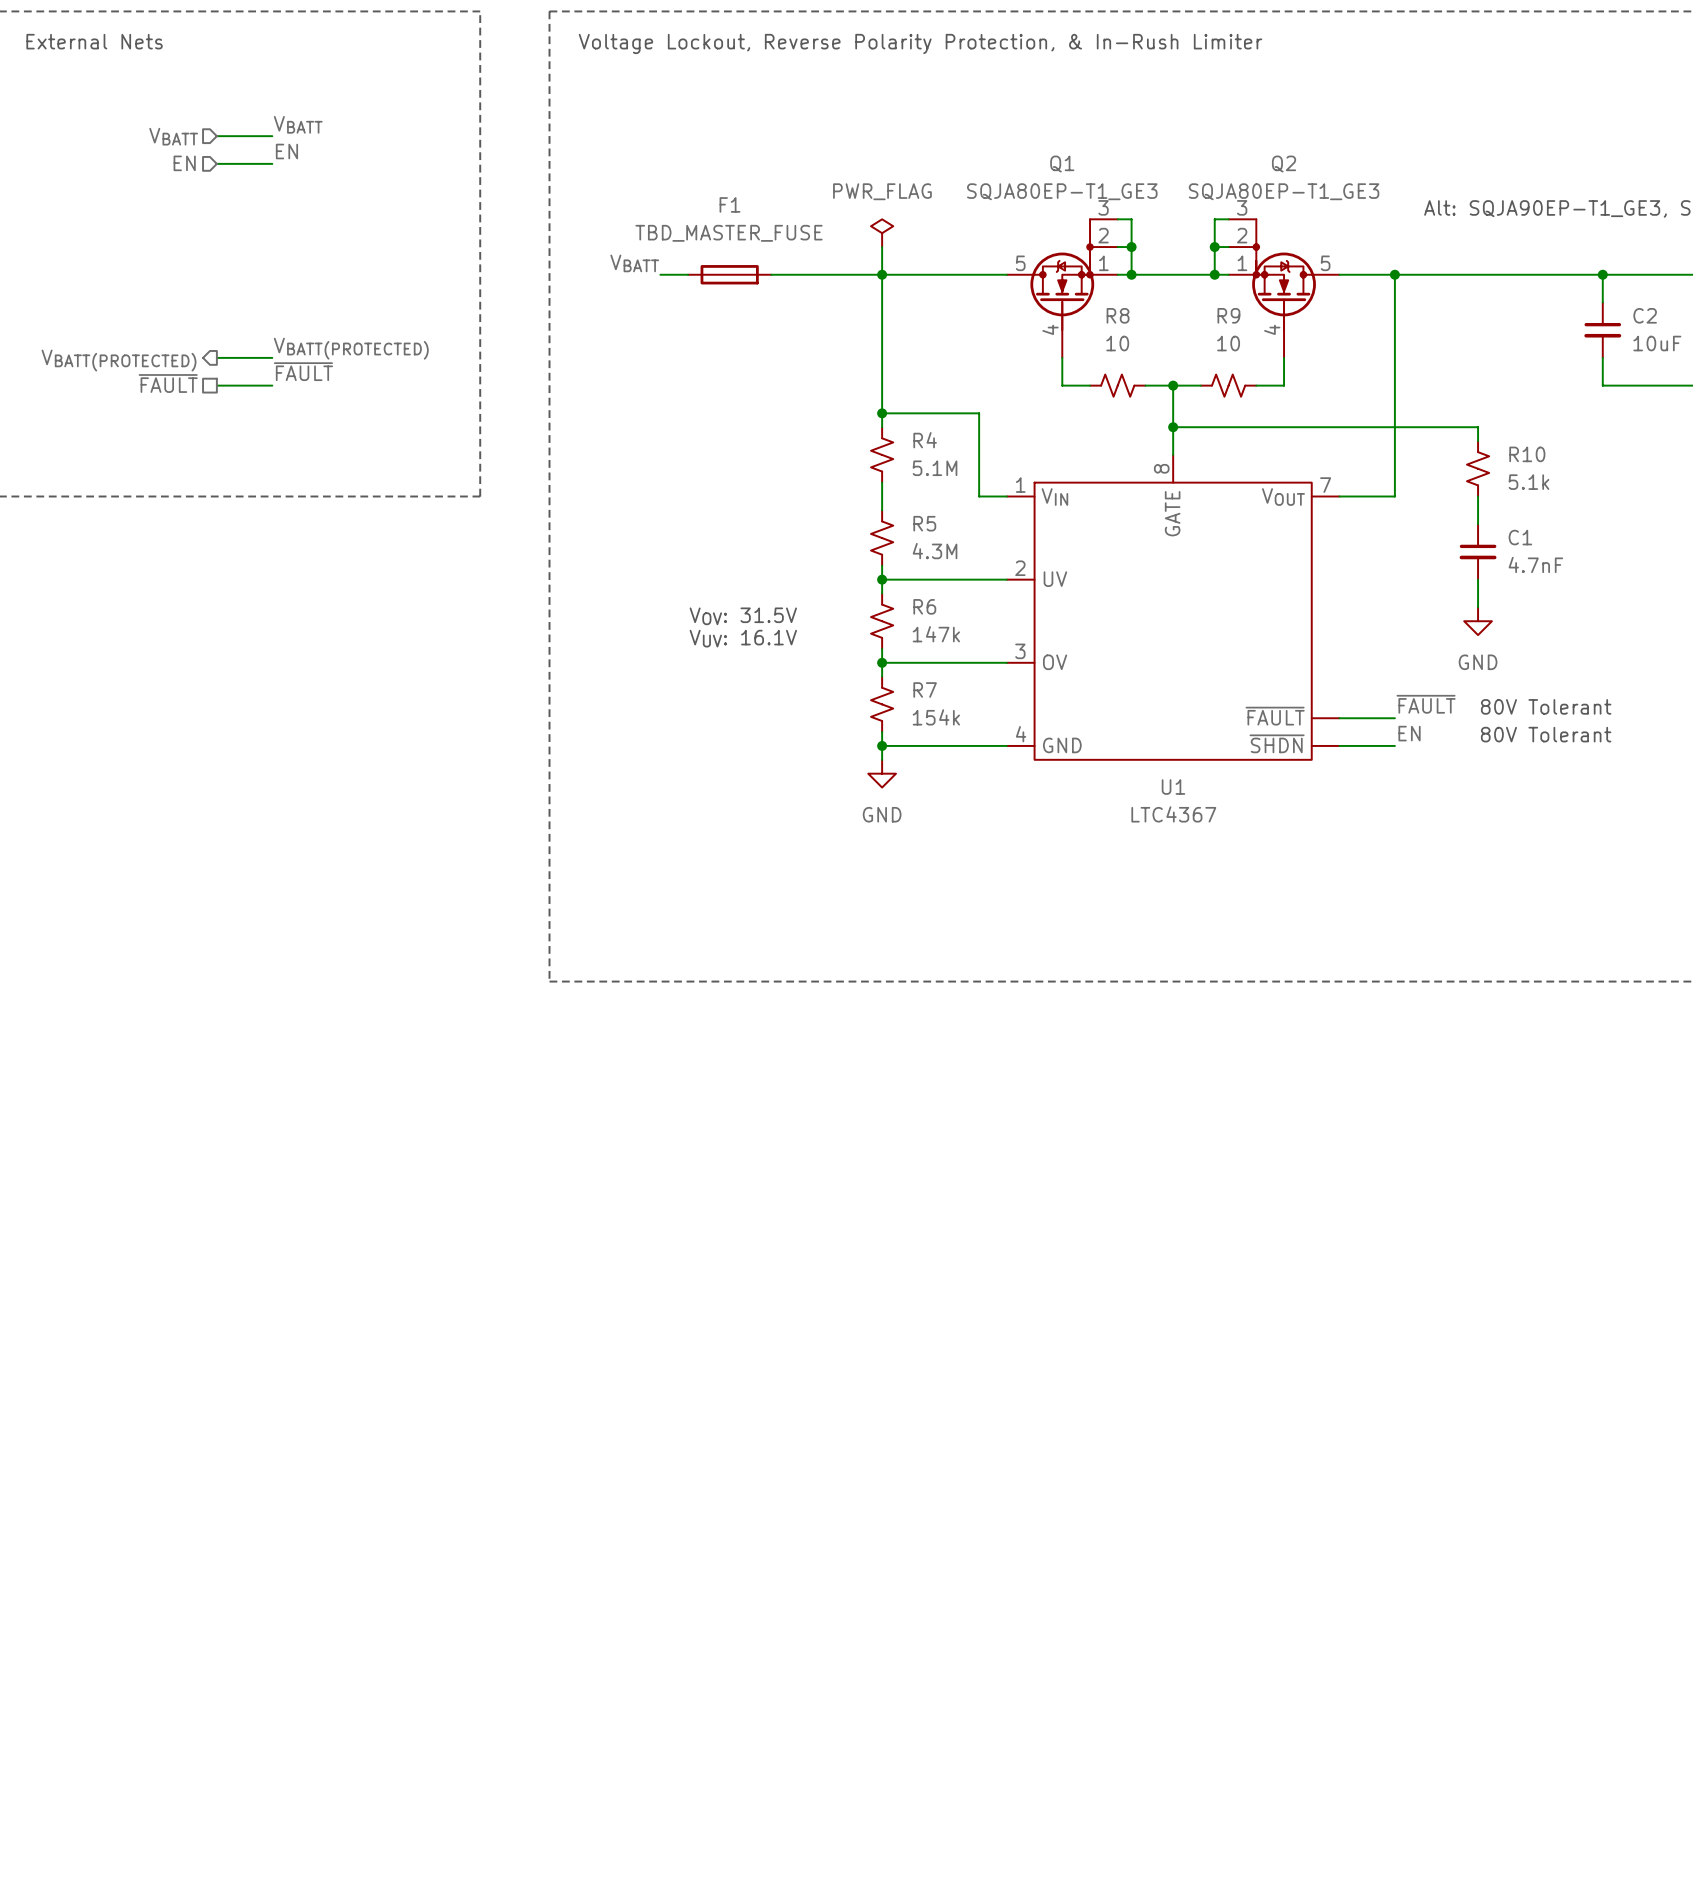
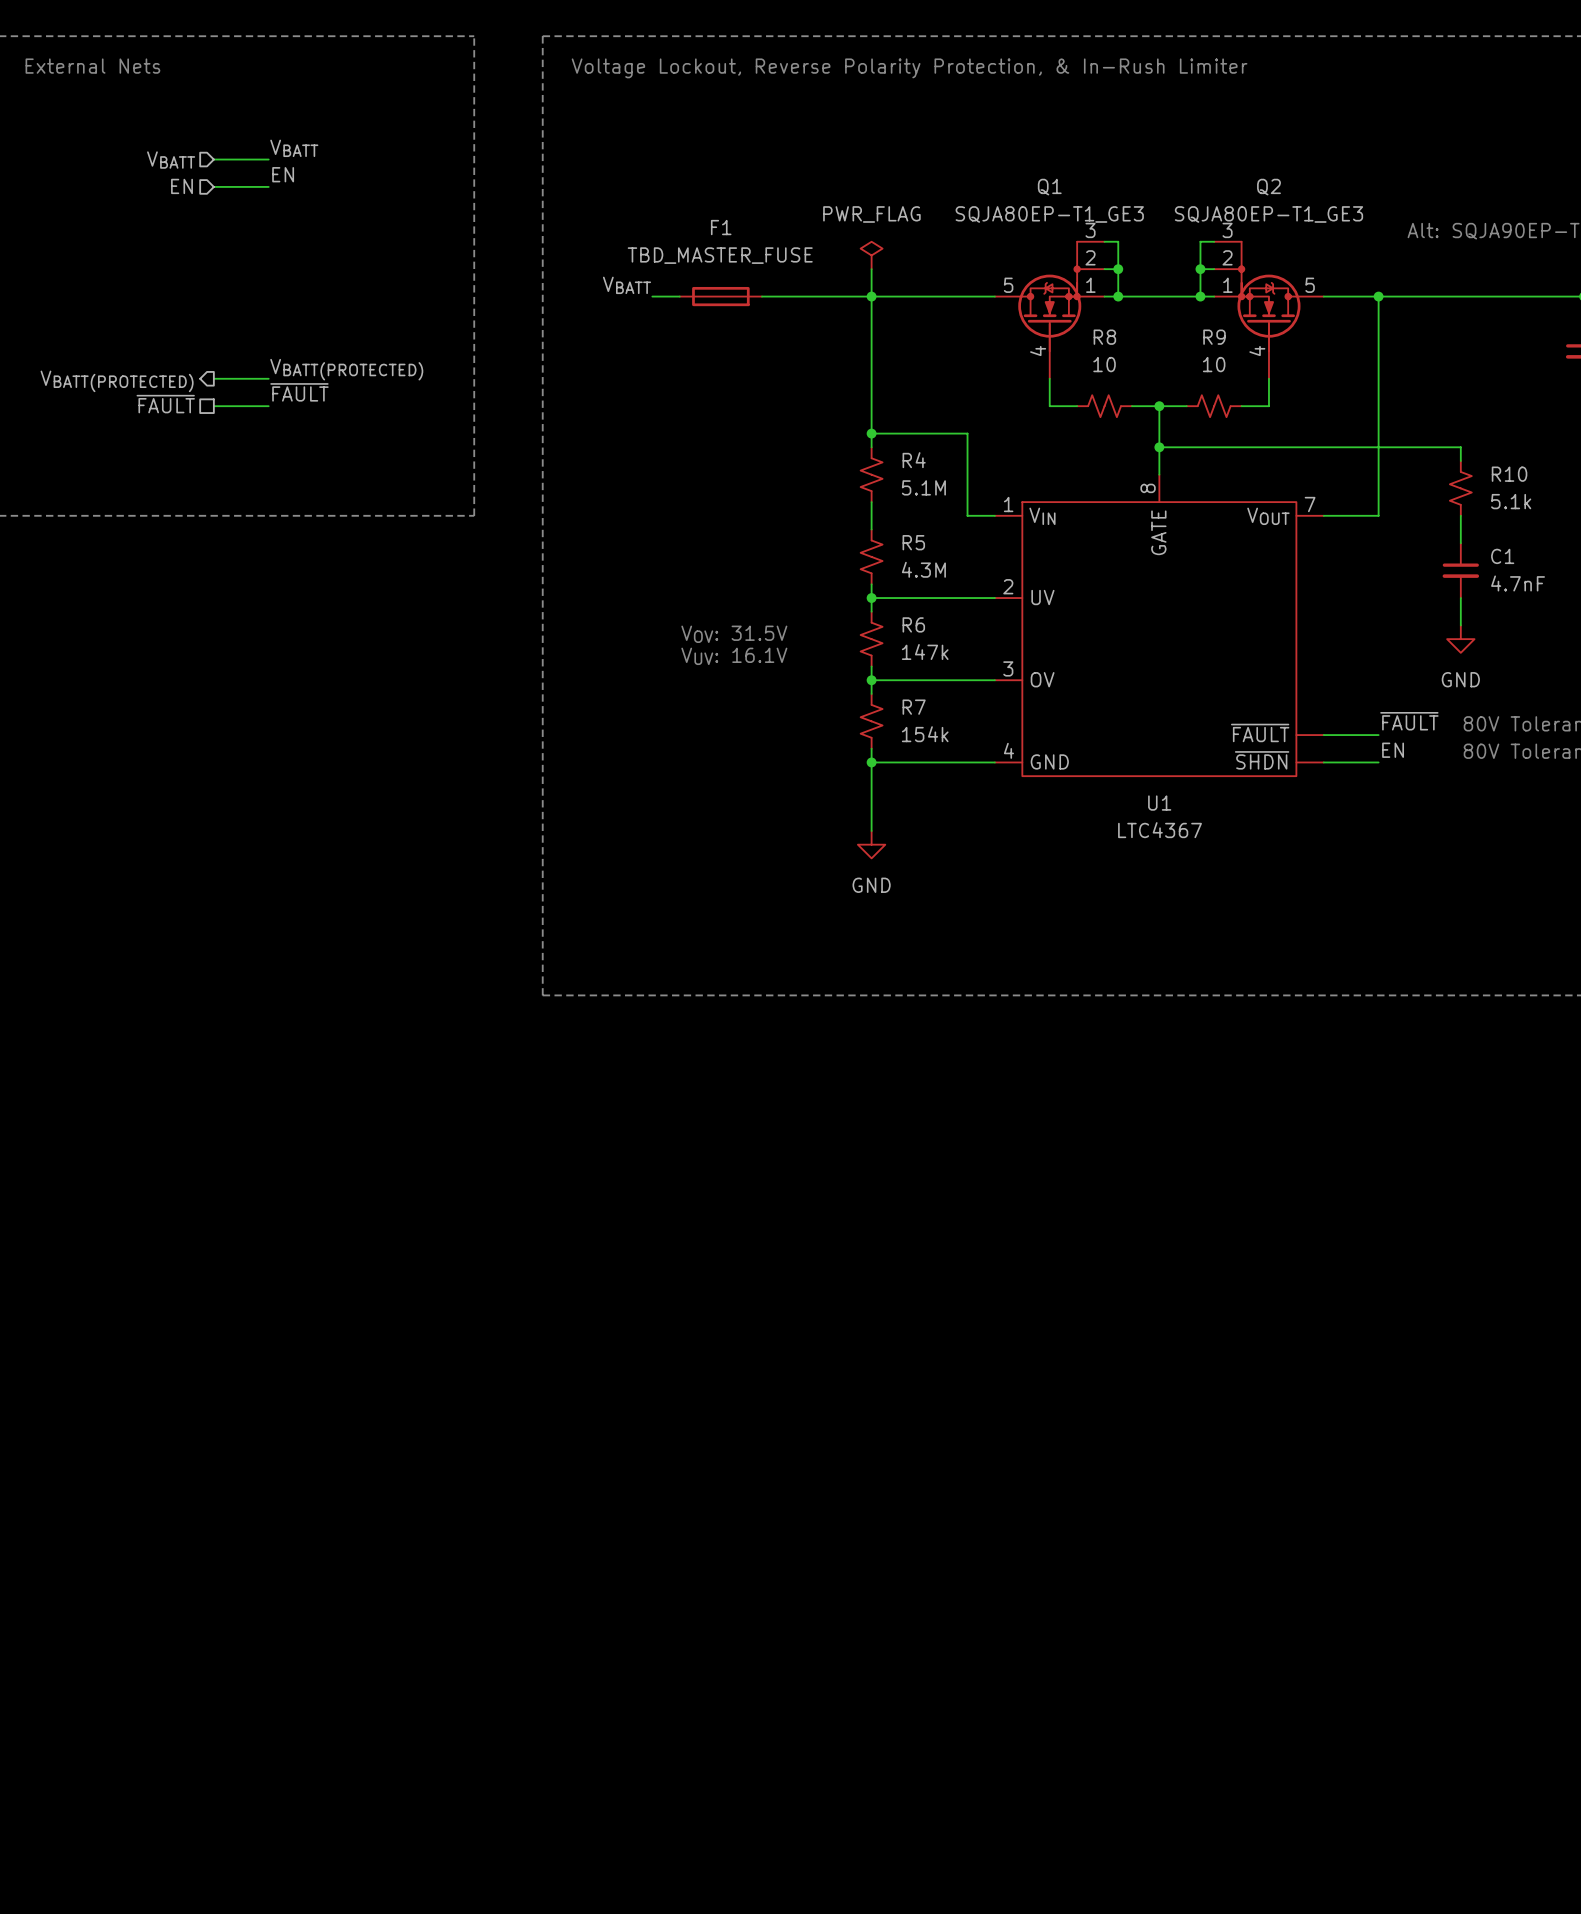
wire: none -> (871, 776) (871, 830)
power symbol position: GND (882, 773) -> GND (871, 844)

